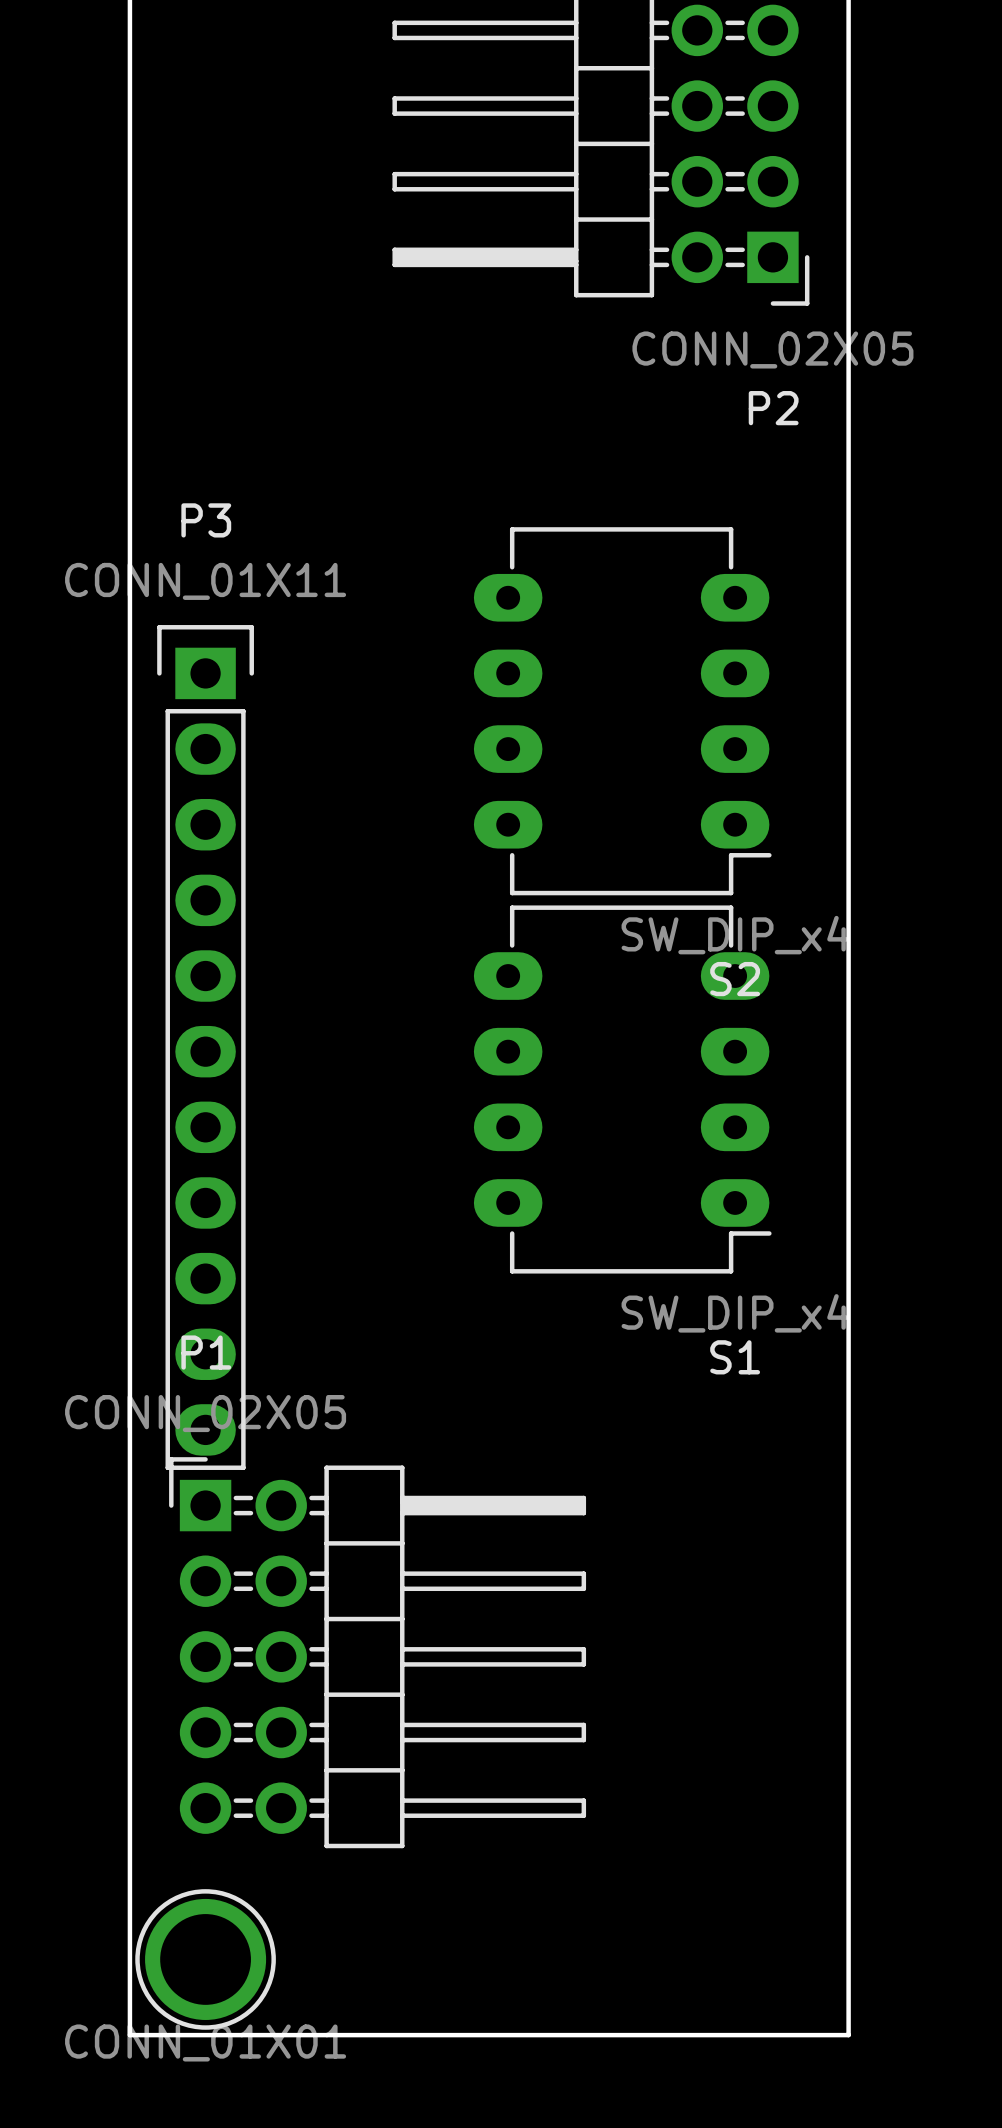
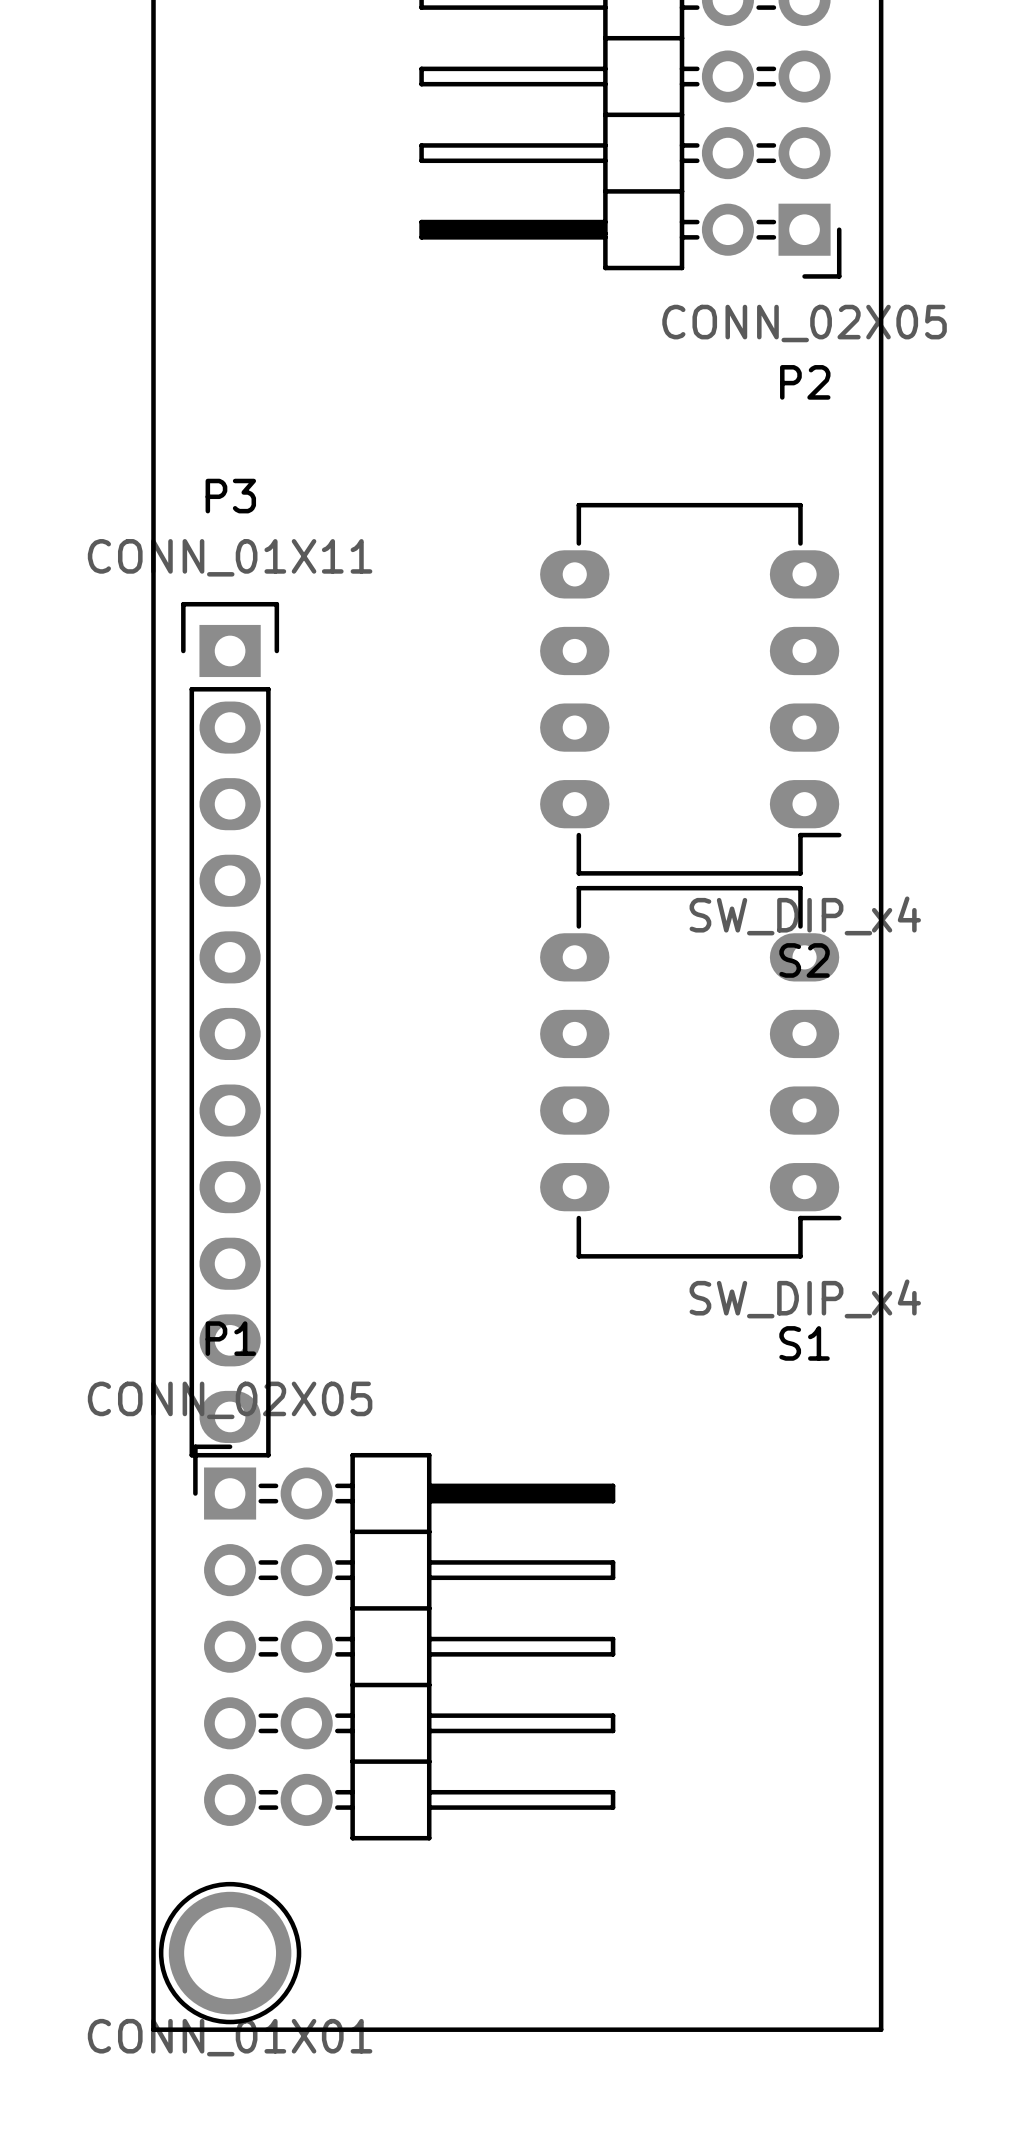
S2 position: (622, 711) -> (690, 689)
S1 position: (622, 1089) -> (690, 1072)

